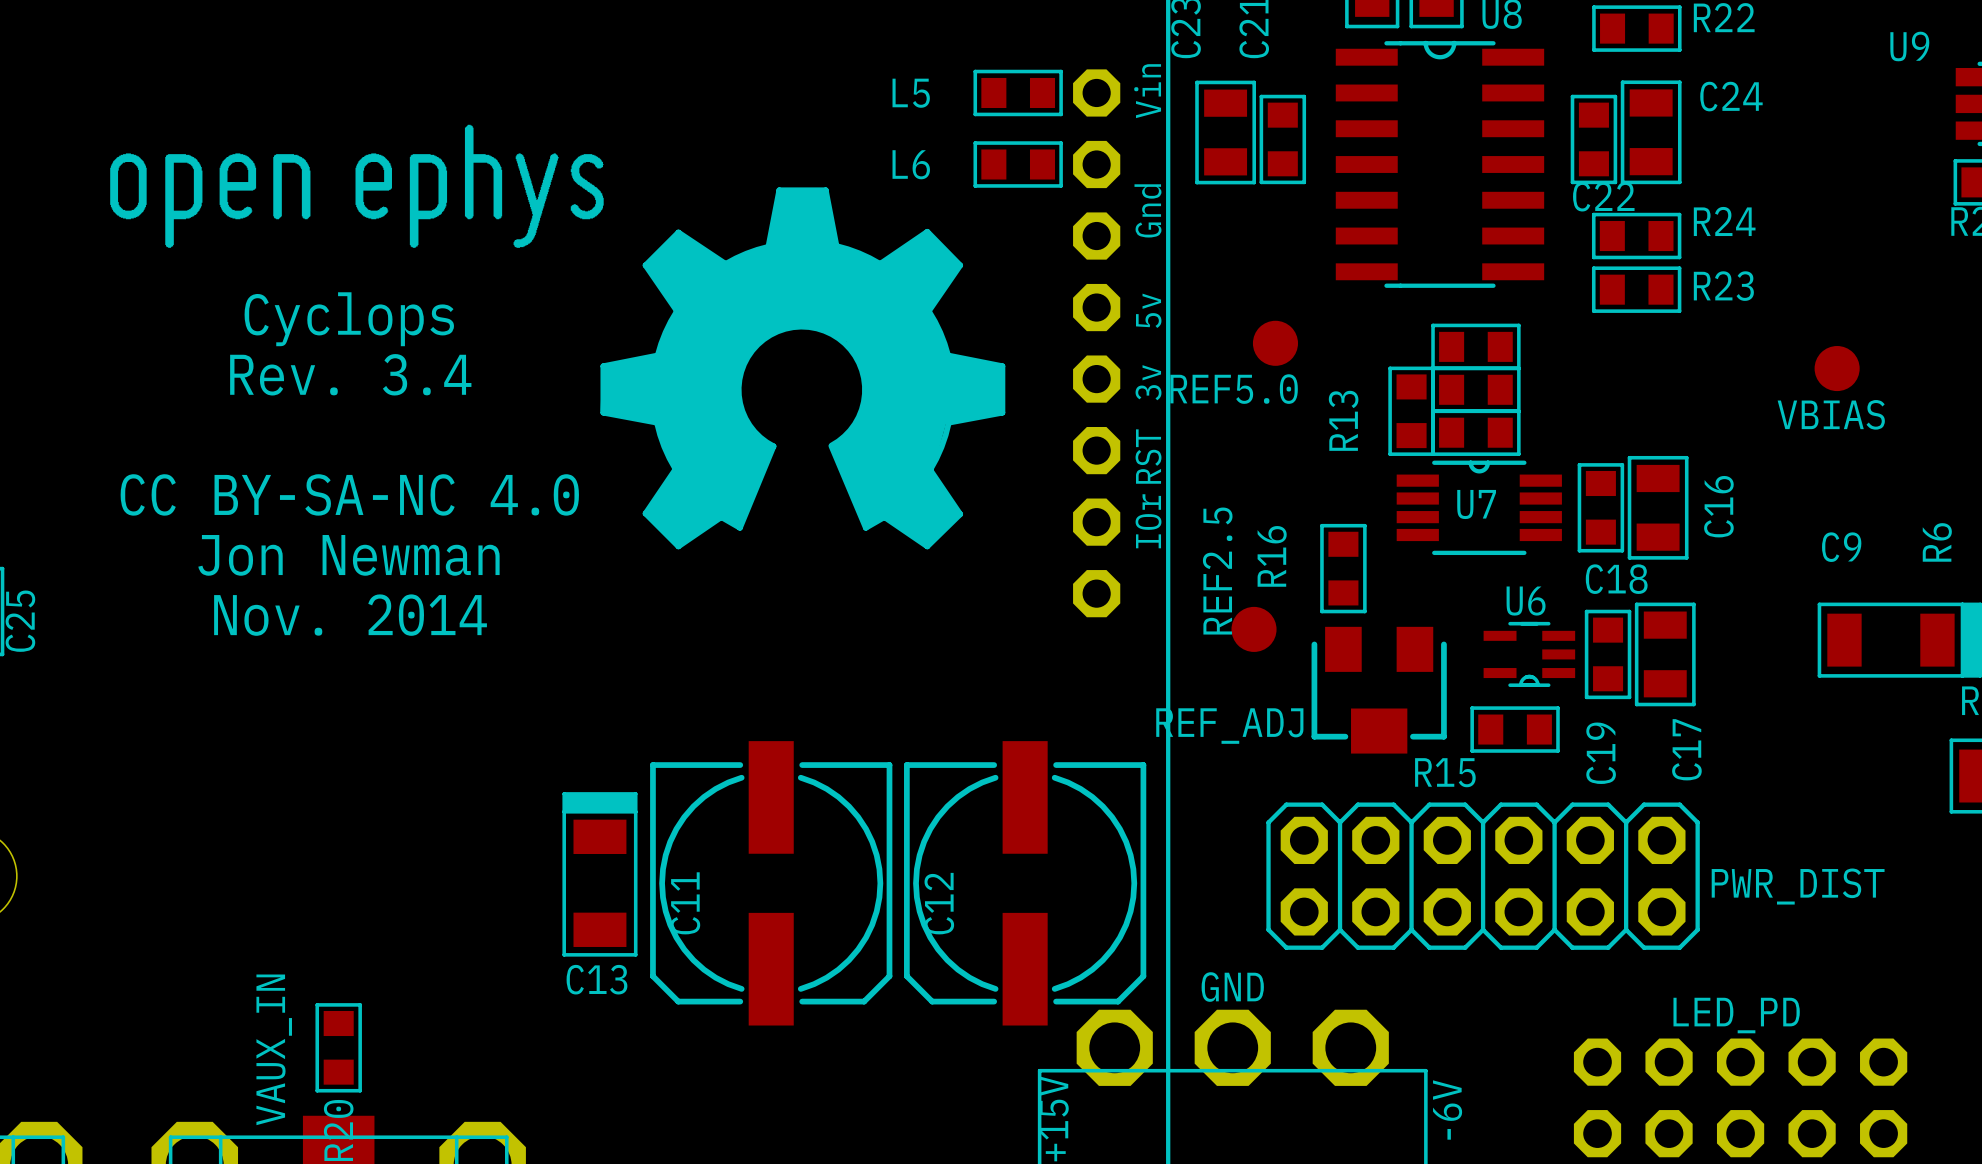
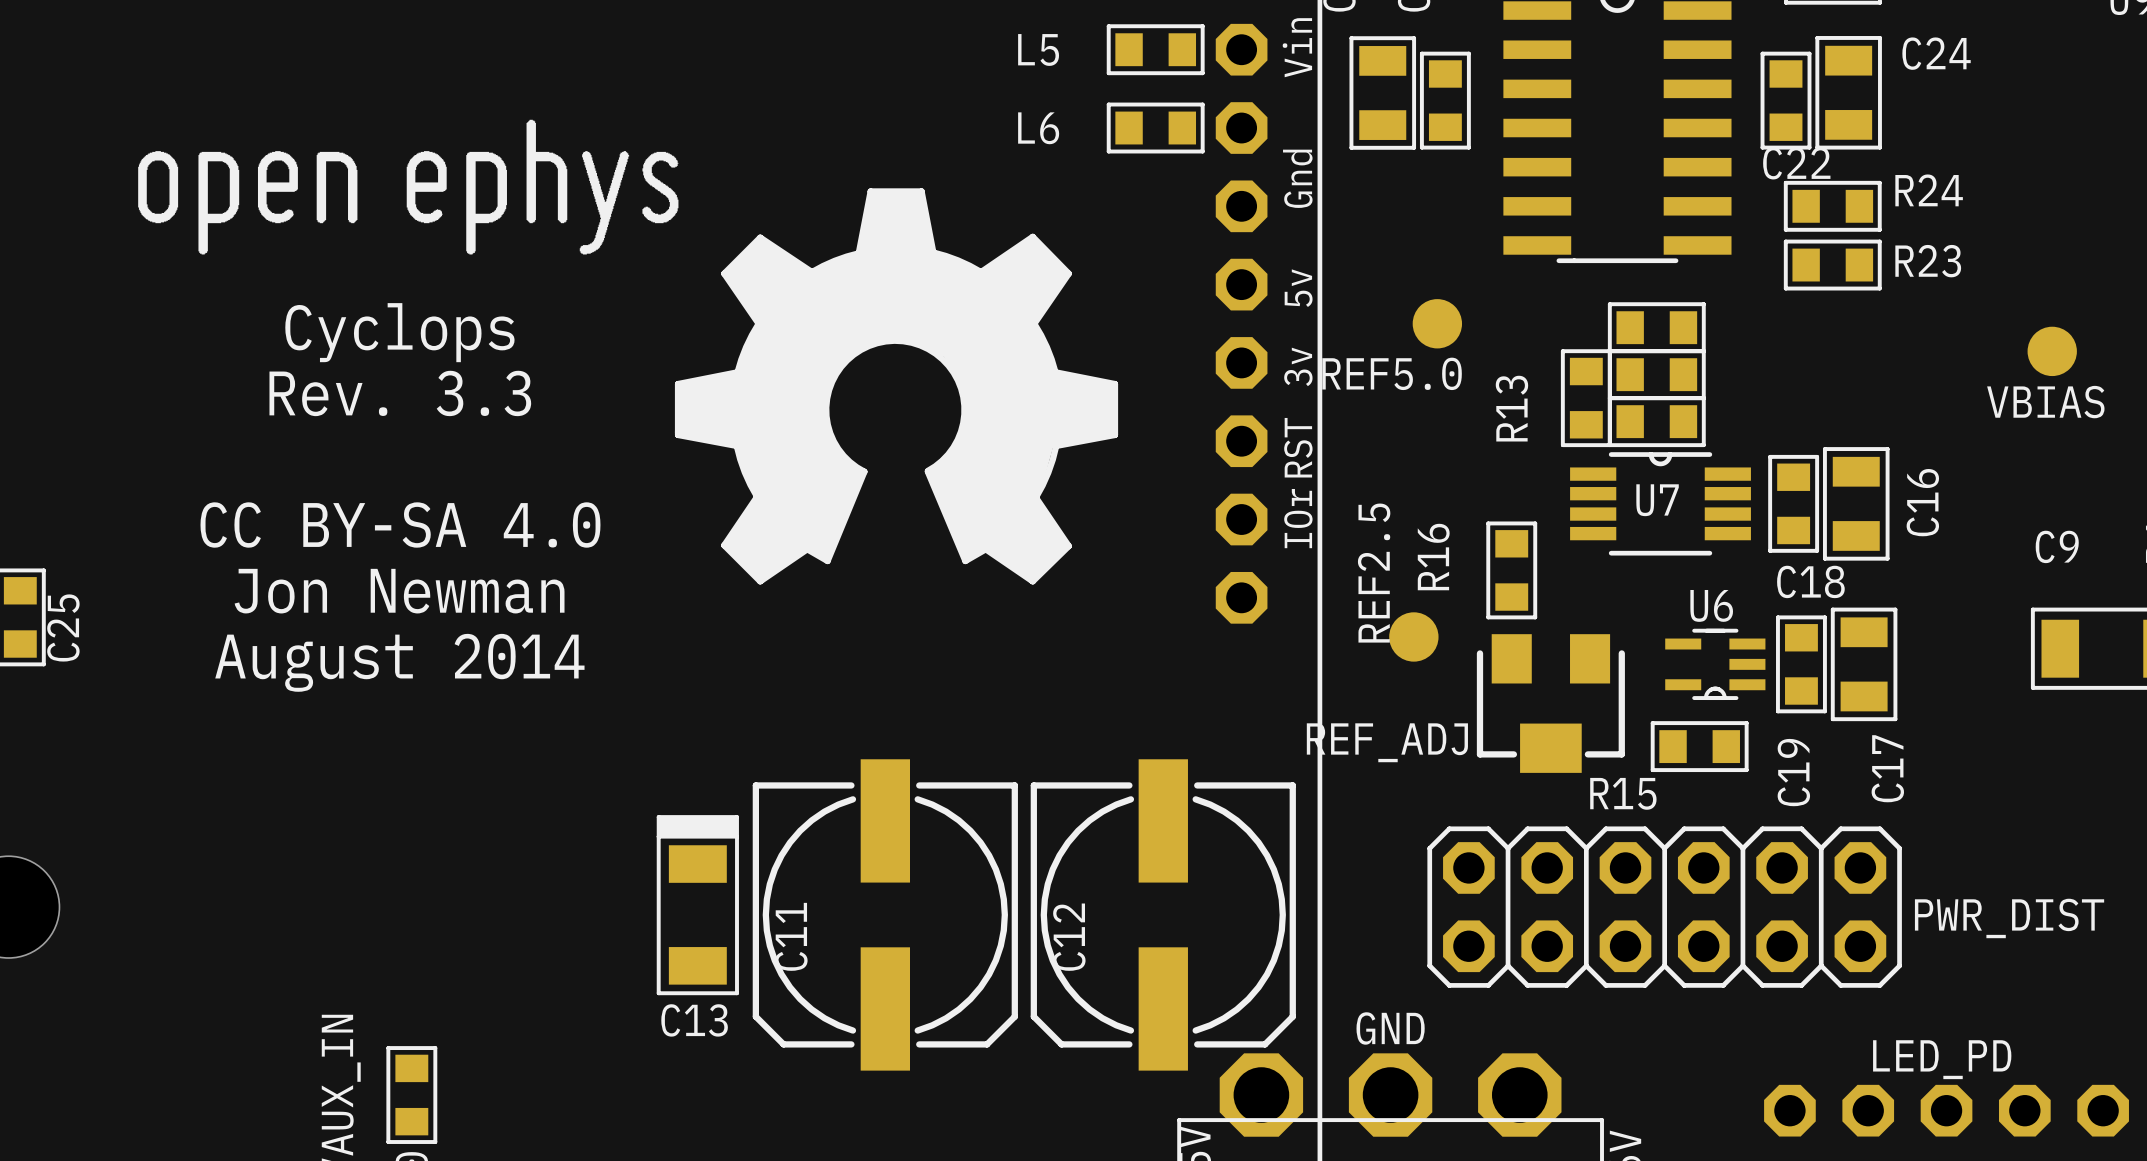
drawing position: (356, 186) -> (408, 187)
text position: Cyclops (349, 319) -> Cyclops (399, 332)
drawing position: (802, 368) -> (896, 386)
text: Rev. 3.4 (350, 374) -> Rev. 3.3 (400, 393)
text: CC BY-SA-NC 4.0 (349, 494) -> CC BY-SA 4.0 (400, 525)
text position: Jon Newman (348, 555) -> Jon Newman (399, 591)
text: Nov. 2014 (350, 615) -> none
text: none -> August 2014 (399, 662)

